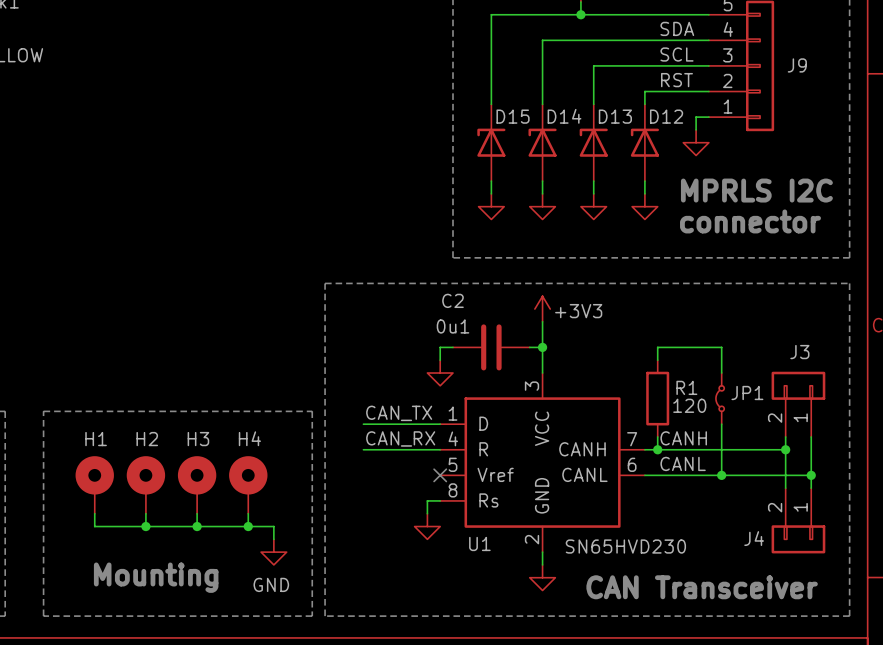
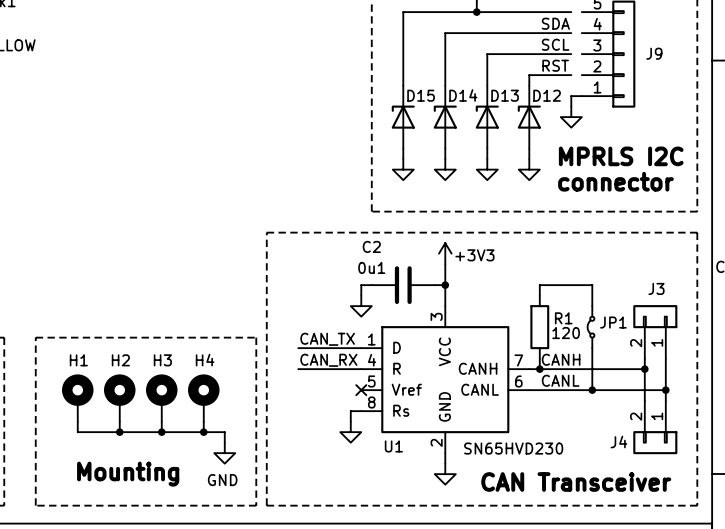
wire: (696, 14) (708, 14) -> none
wire: (696, 40) (708, 40) -> none
wire: (696, 65) (708, 65) -> none
wire: (696, 91) (708, 91) -> none

